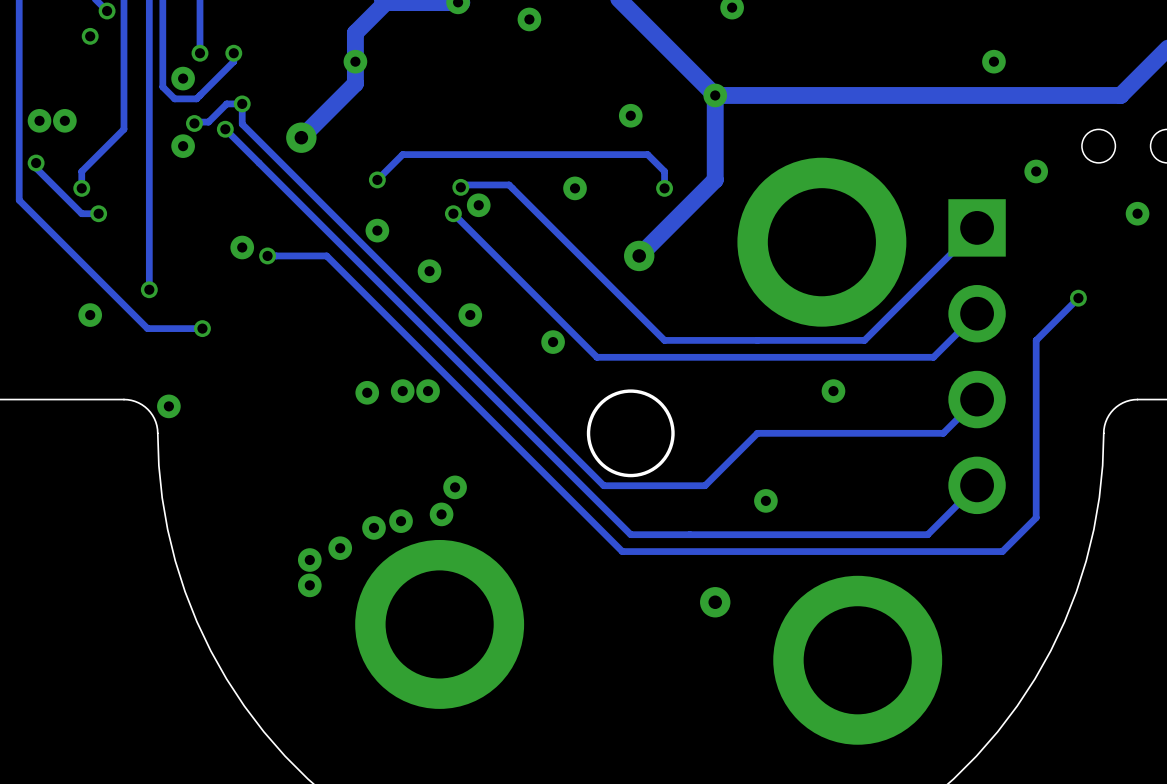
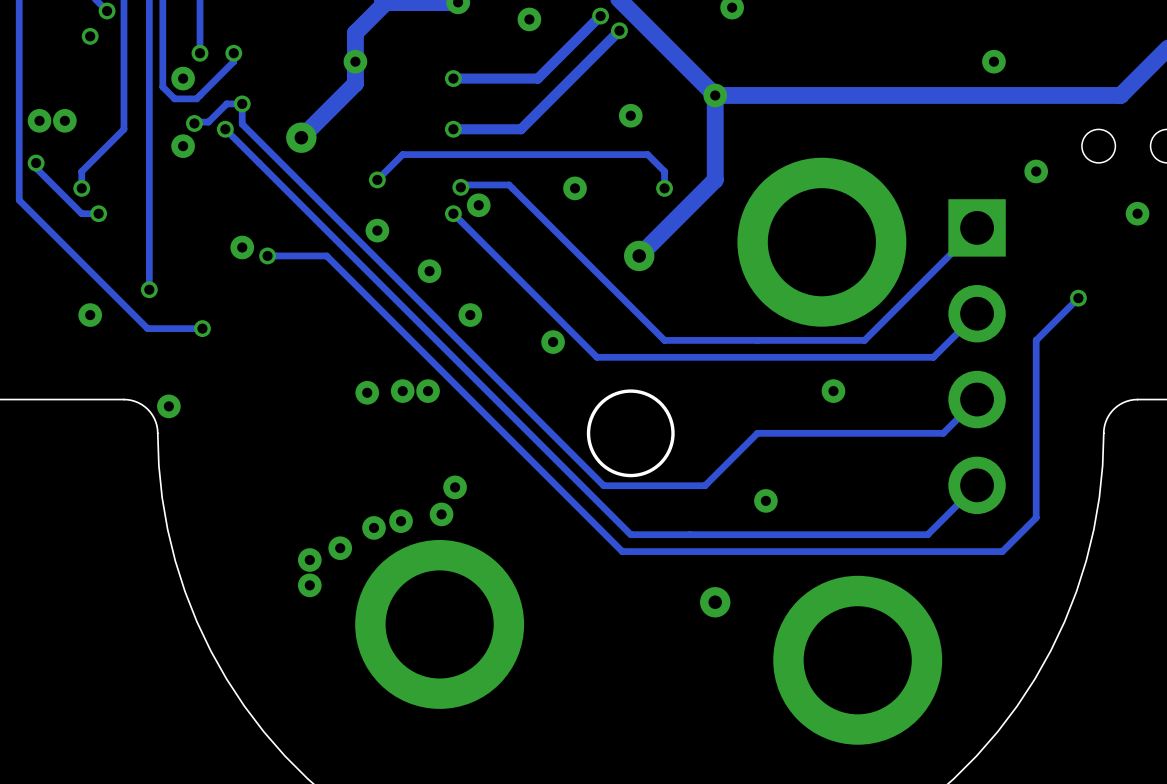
track: none -> (600, 16) (537, 78) (453, 78)
via: none -> (600, 16)
track: none -> (619, 30) (520, 129) (453, 129)
via: none -> (619, 30)
via: none -> (453, 78)
via: none -> (453, 129)

